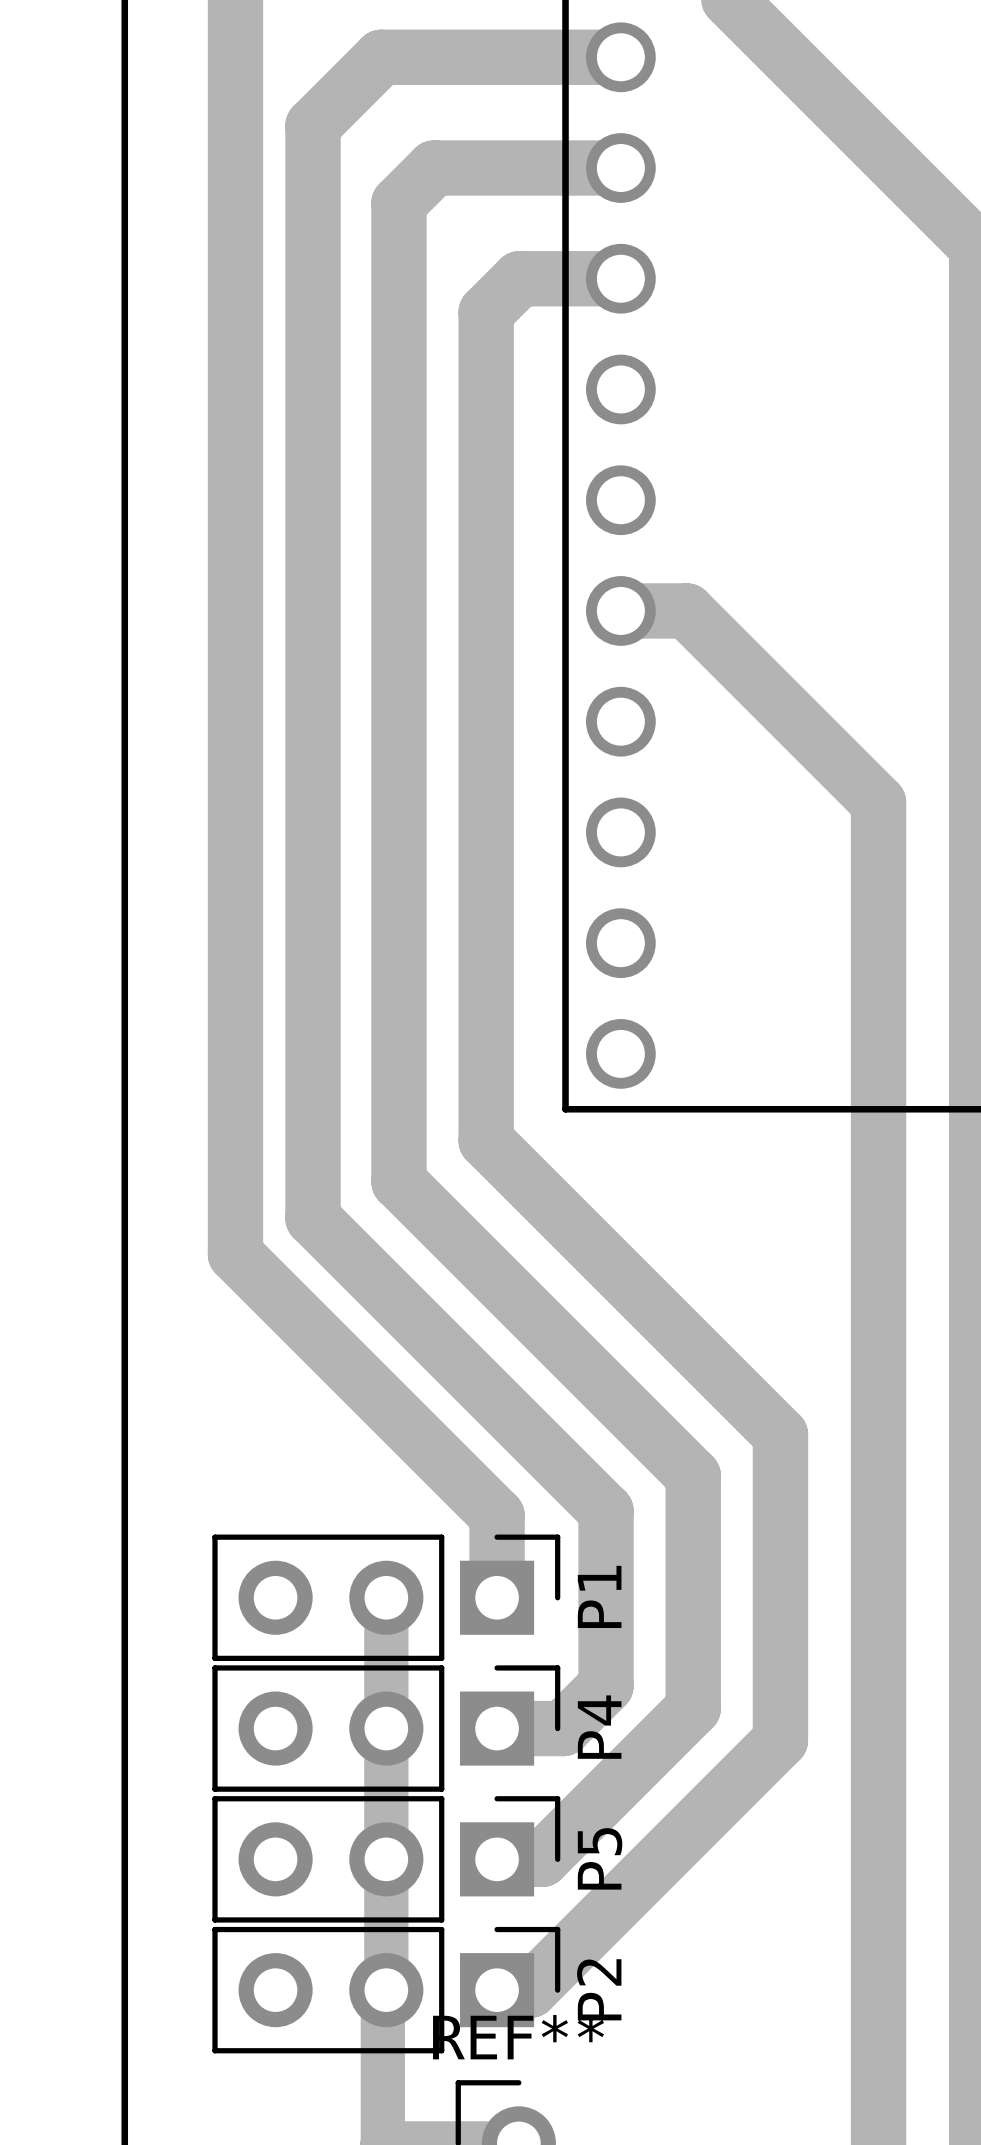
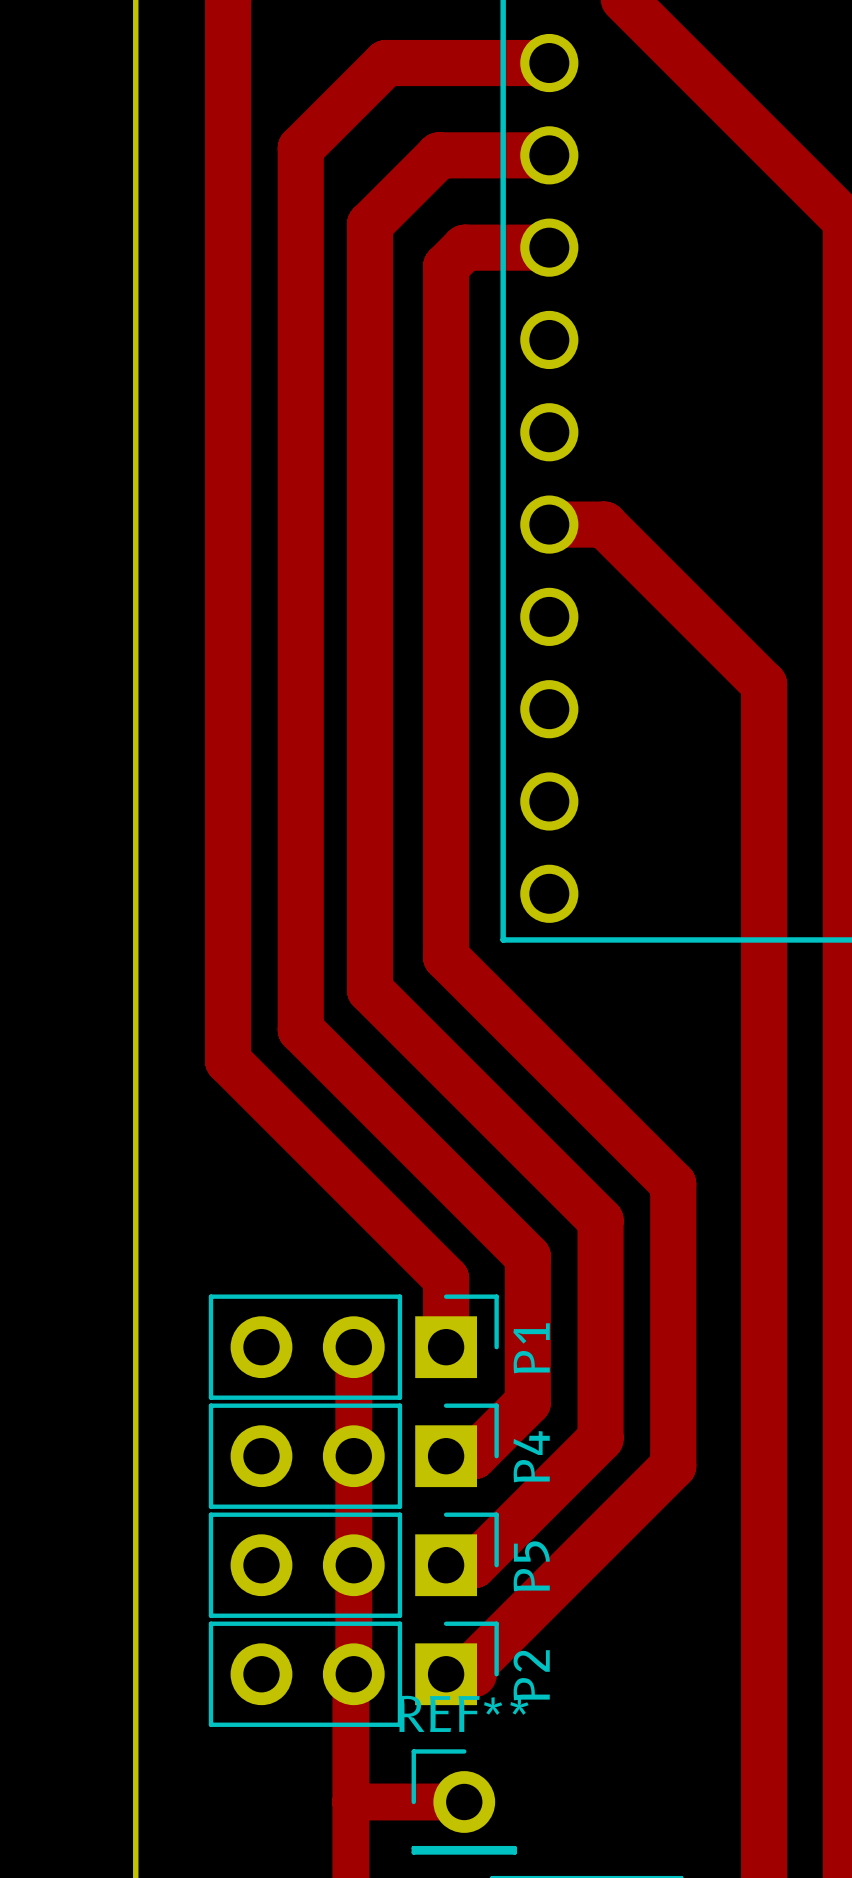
track: (425, 57) (381, 57) (313, 125) (313, 1218) (606, 1511) (606, 1685) (563, 1728) (530, 1728) -> (386, 63) (300, 148) (300, 1029) (527, 1256) (527, 1402) (473, 1456)
track: (488, 168) (434, 168) (398, 203) (398, 1181) (693, 1476) (693, 1708) (541, 1859) (530, 1859) -> (439, 155) (369, 224) (369, 989) (600, 1220) (600, 1438) (473, 1565)
track: (497, 301) (486, 312) (486, 1140) (780, 1434) (780, 1740) (530, 1990) -> (446, 266) (446, 957) (673, 1184) (673, 1465) (464, 1674)

